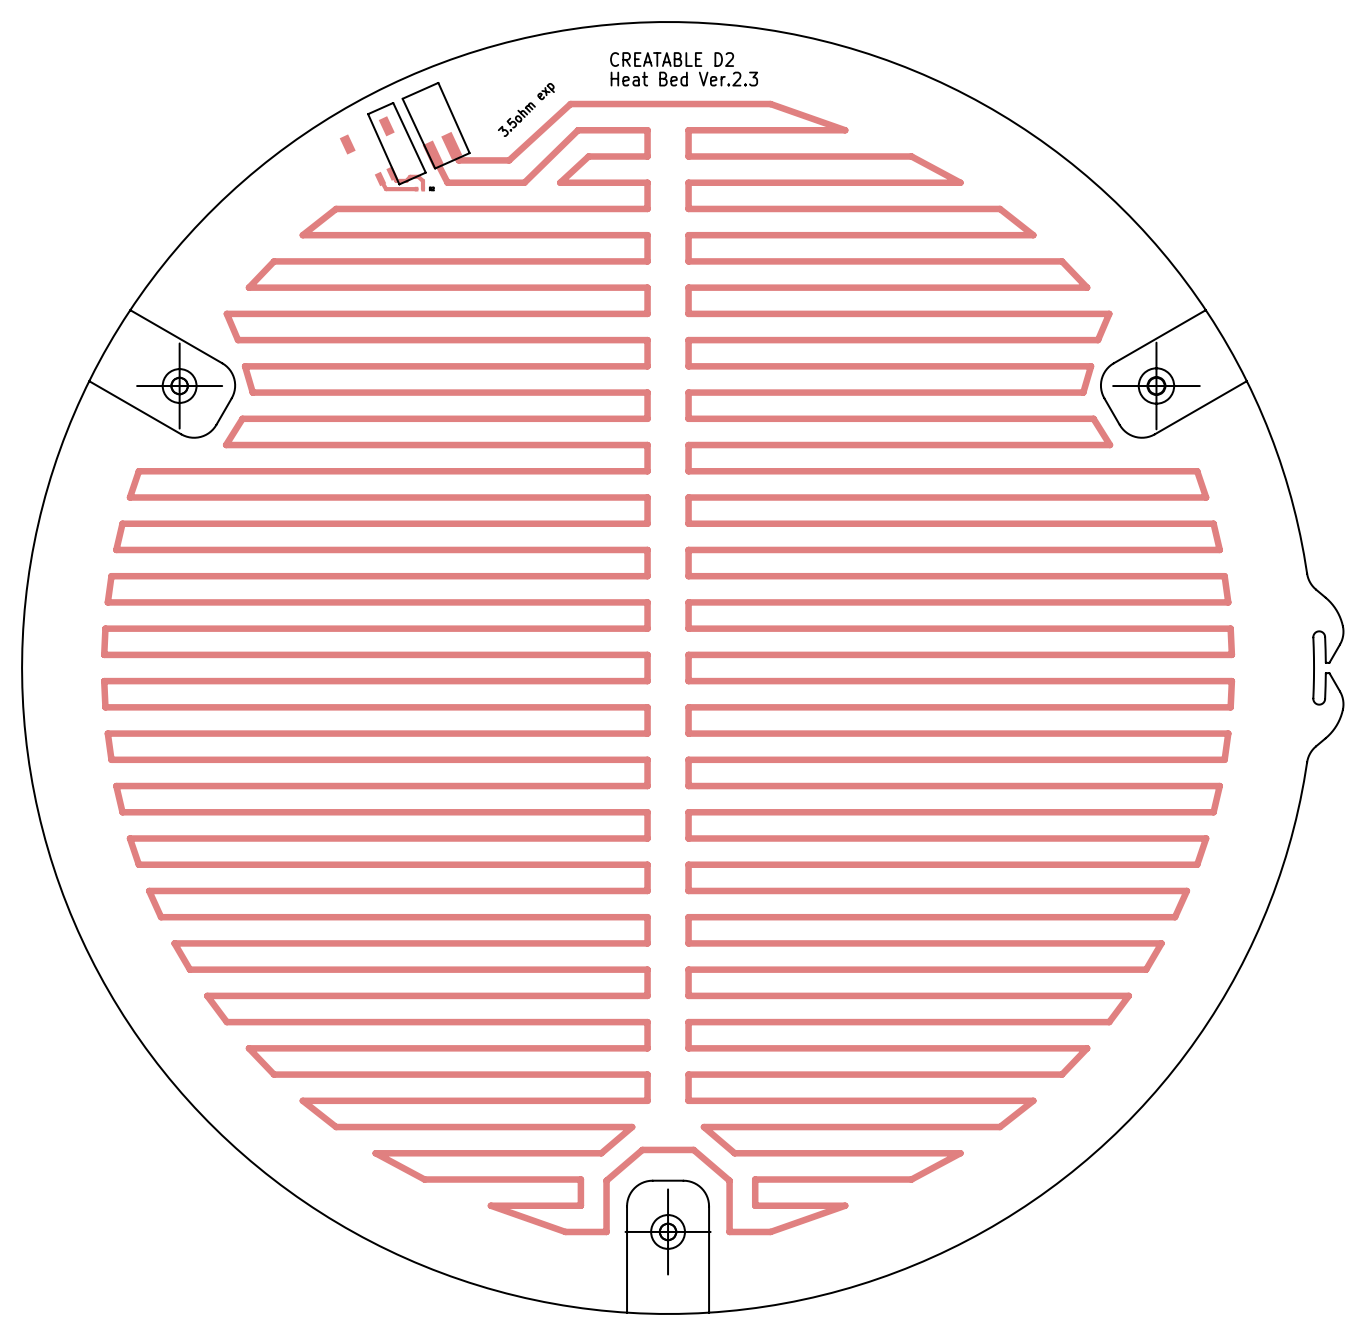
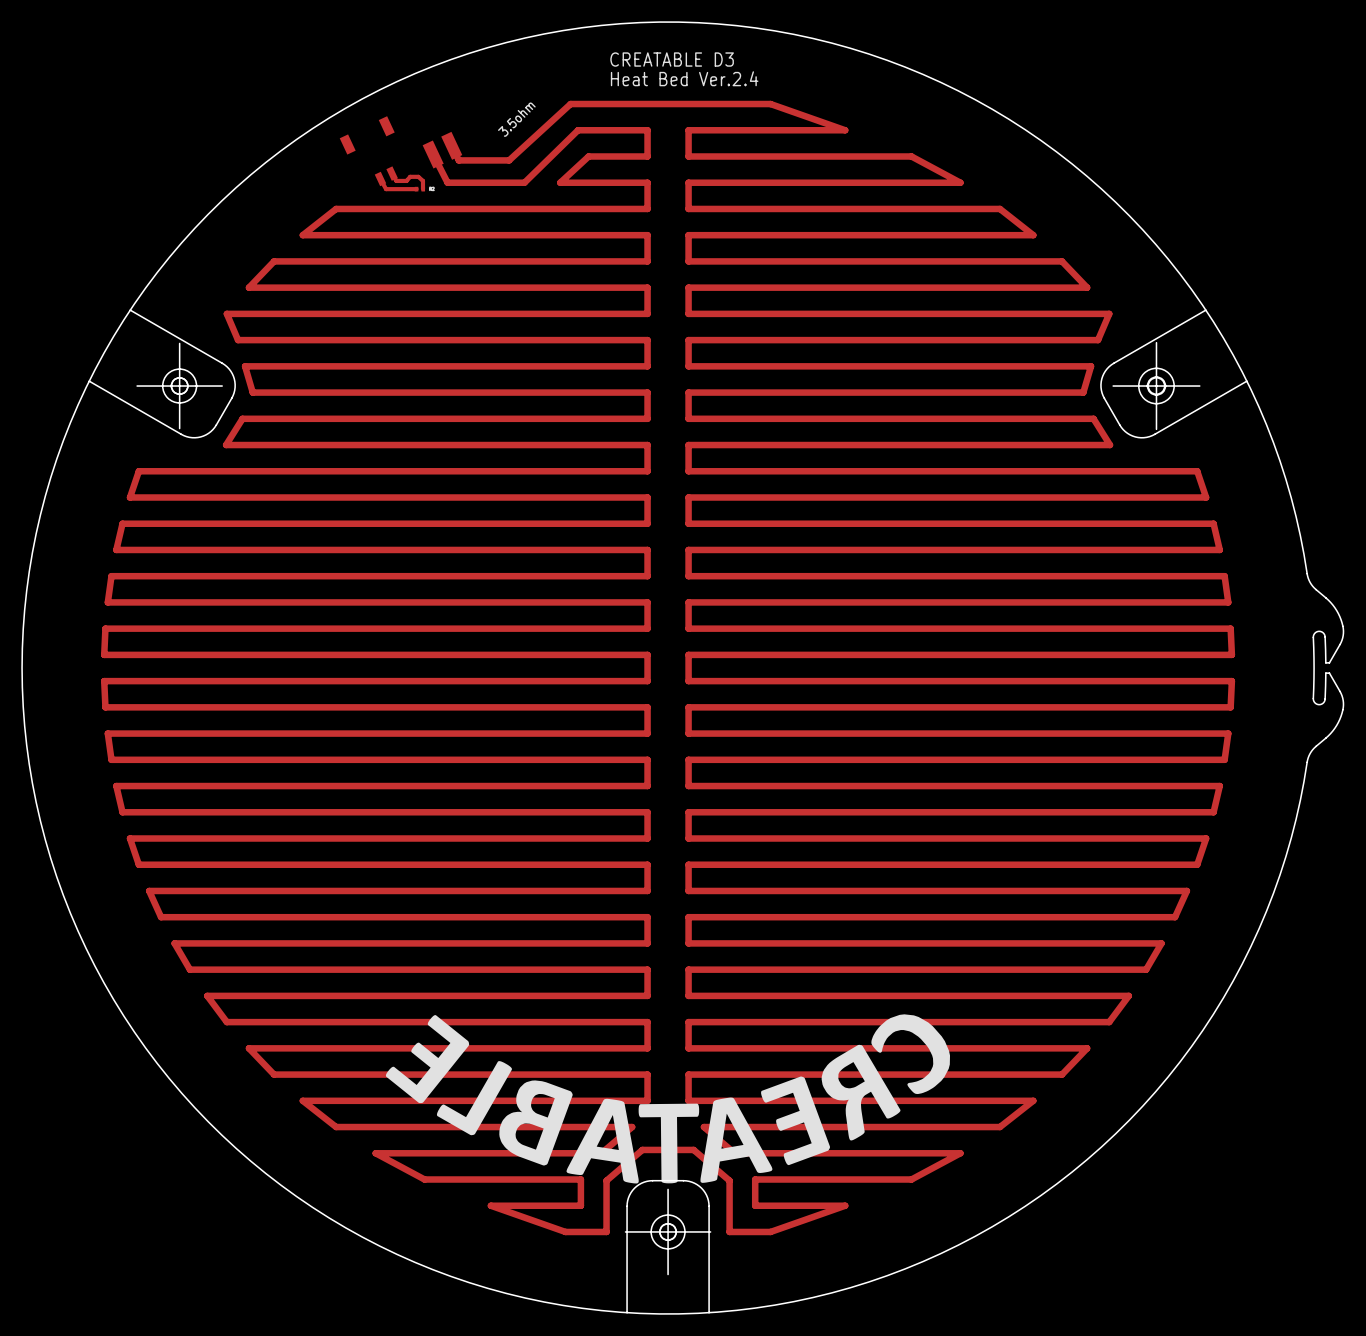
part footprint: [22, 22, 1344, 1314] -> [22, 22, 1344, 1314]
text: CREATABLE D2 (672, 59) -> CREATABLE D3 (672, 59)
text: Heat Bed Ver.2.3 (684, 79) -> Heat Bed Ver.2.4 (684, 78)
text: 3.5ohm exp (526, 109) -> 3.5ohm (516, 119)
drawing: none -> [385, 1014, 951, 1184]

